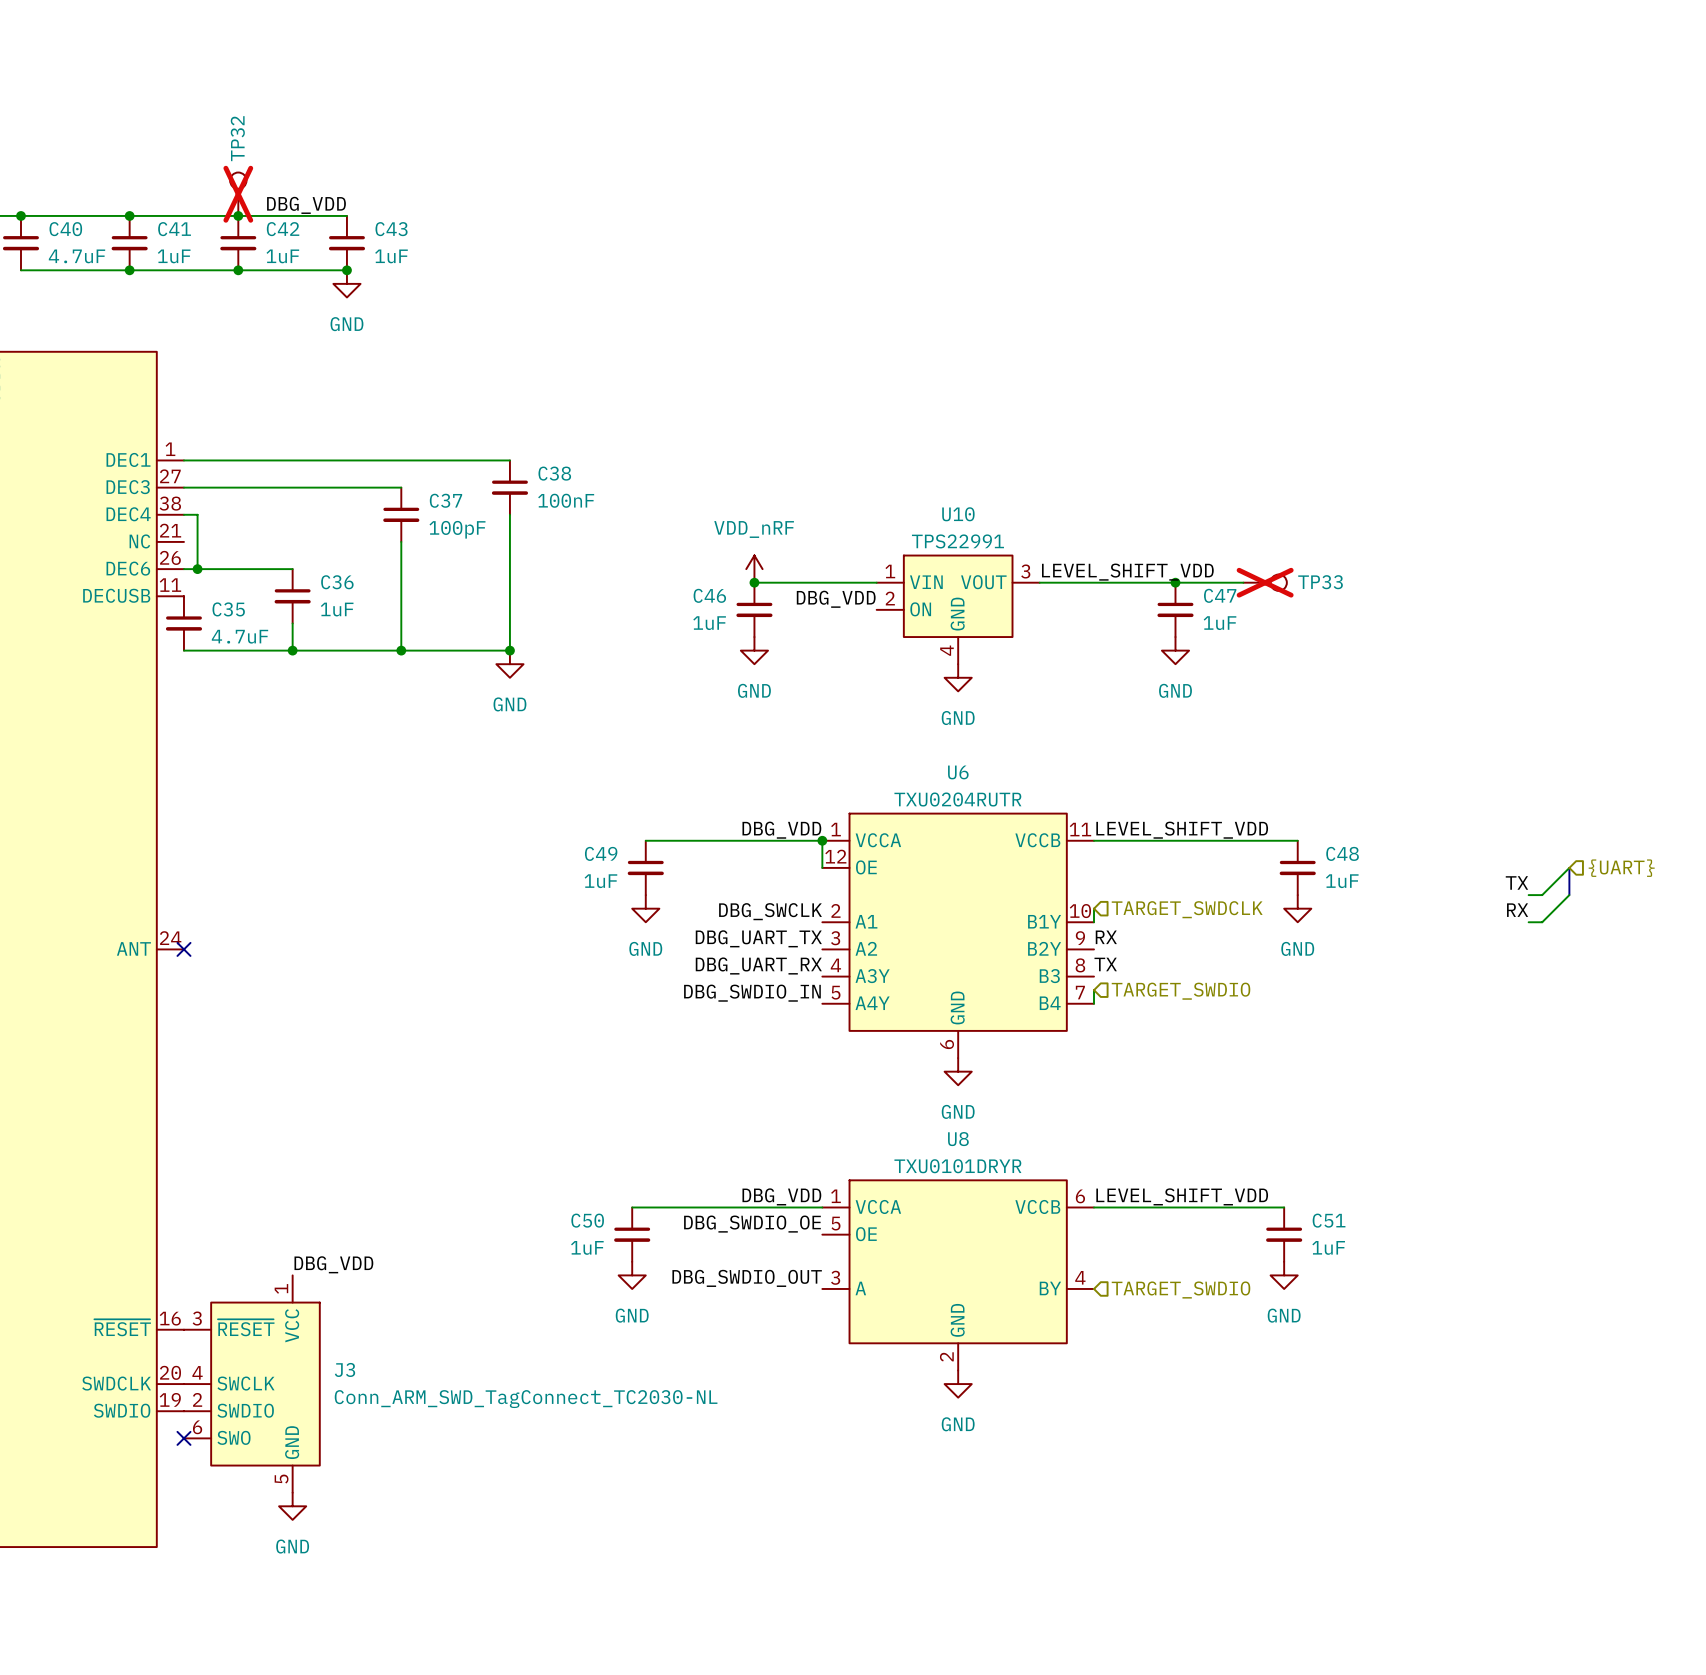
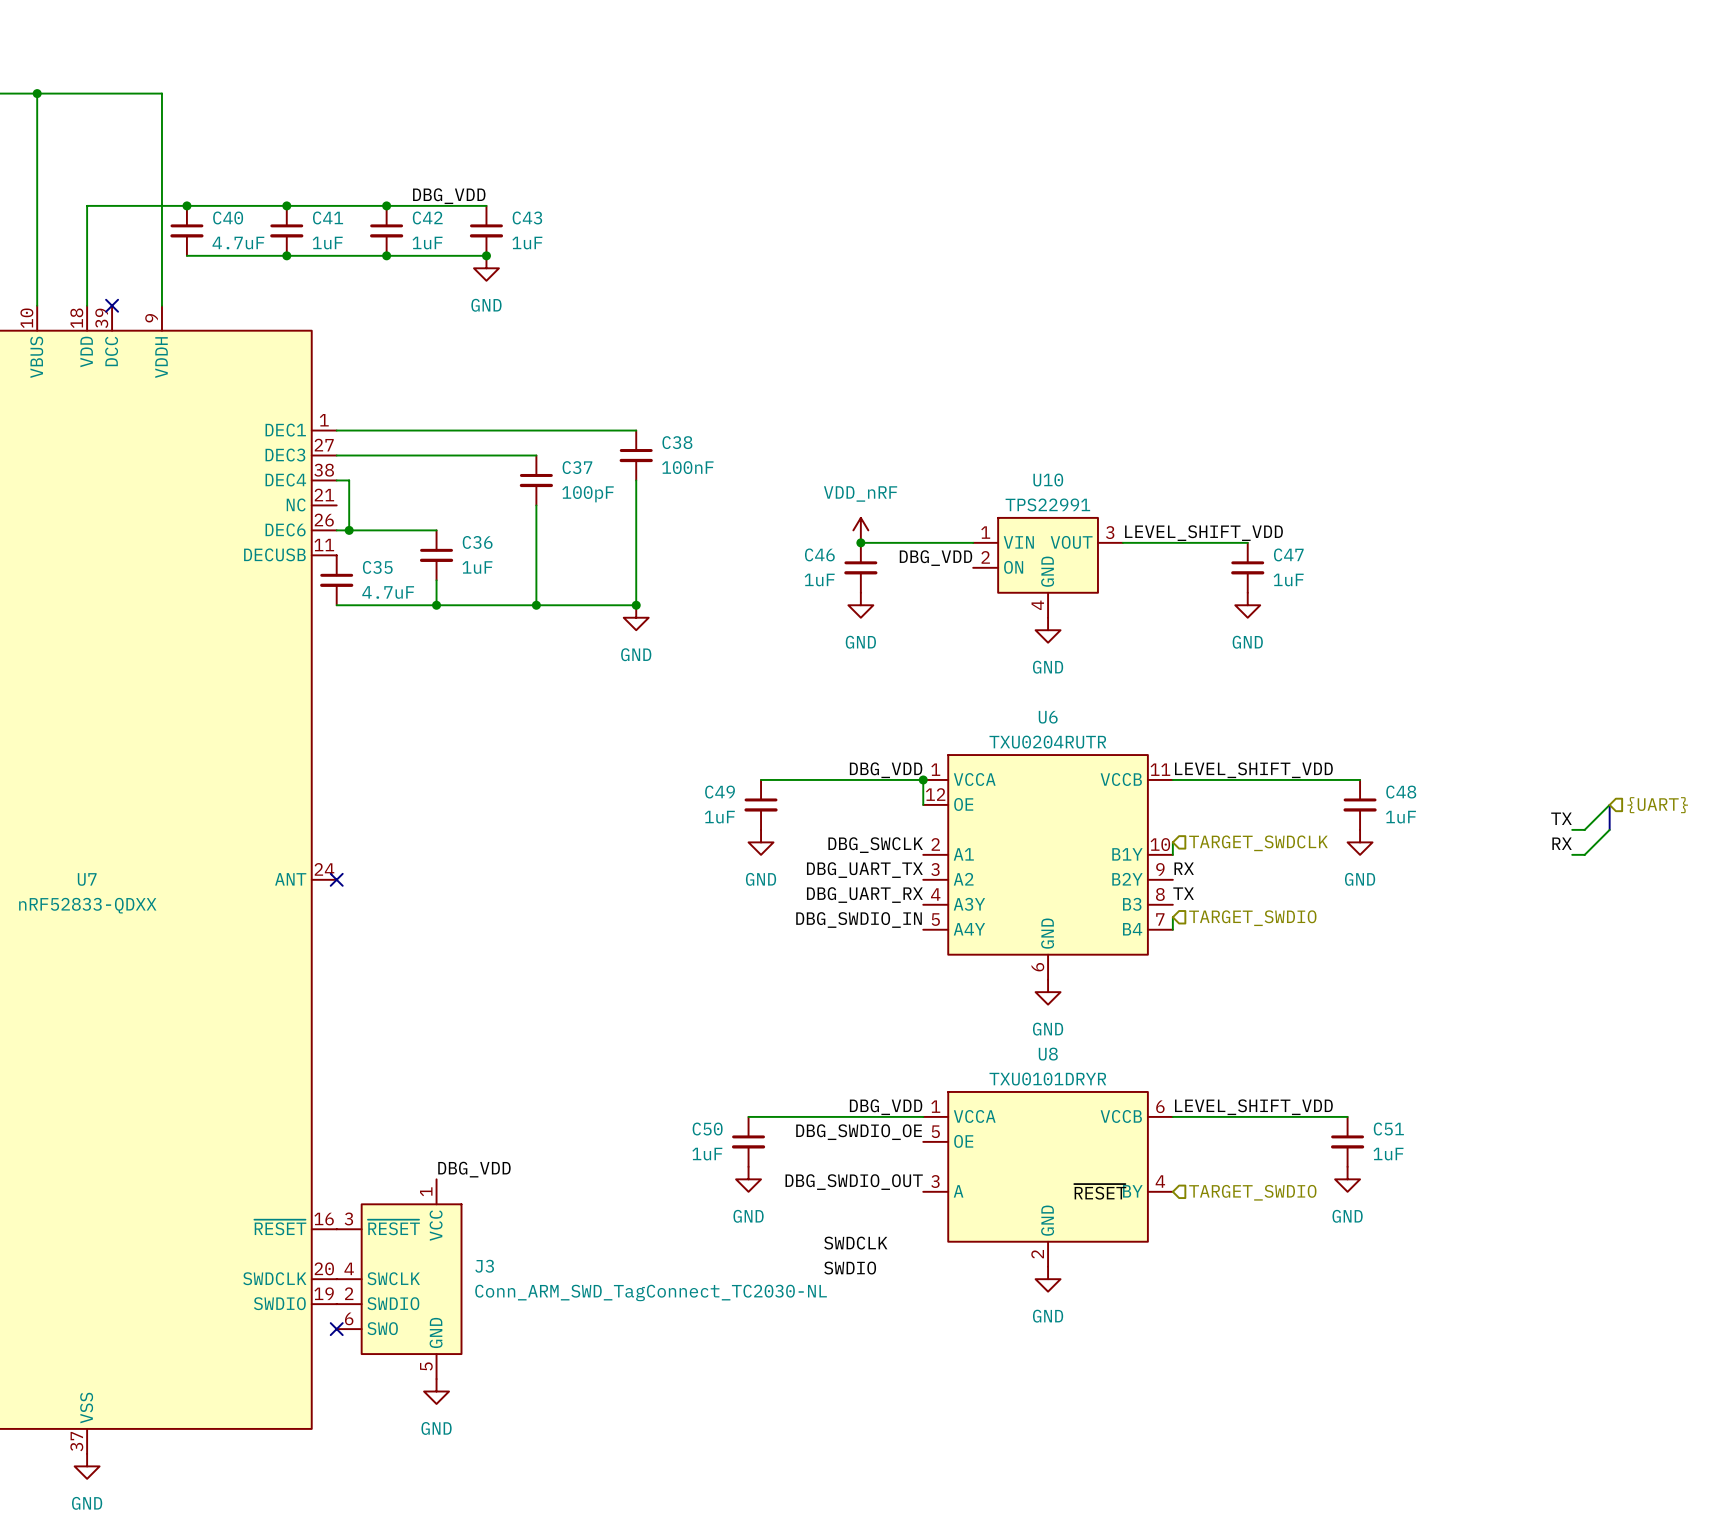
TP32: (238, 194) -> none
wire: (1175, 582) (1243, 582) -> none
junction: (1175, 582) -> none
TP33: (1265, 582) -> none
label: none -> ~{RESET} (1100, 1191)
label: none -> SWDCLK (855, 1243)
label: none -> SWDIO (850, 1268)

